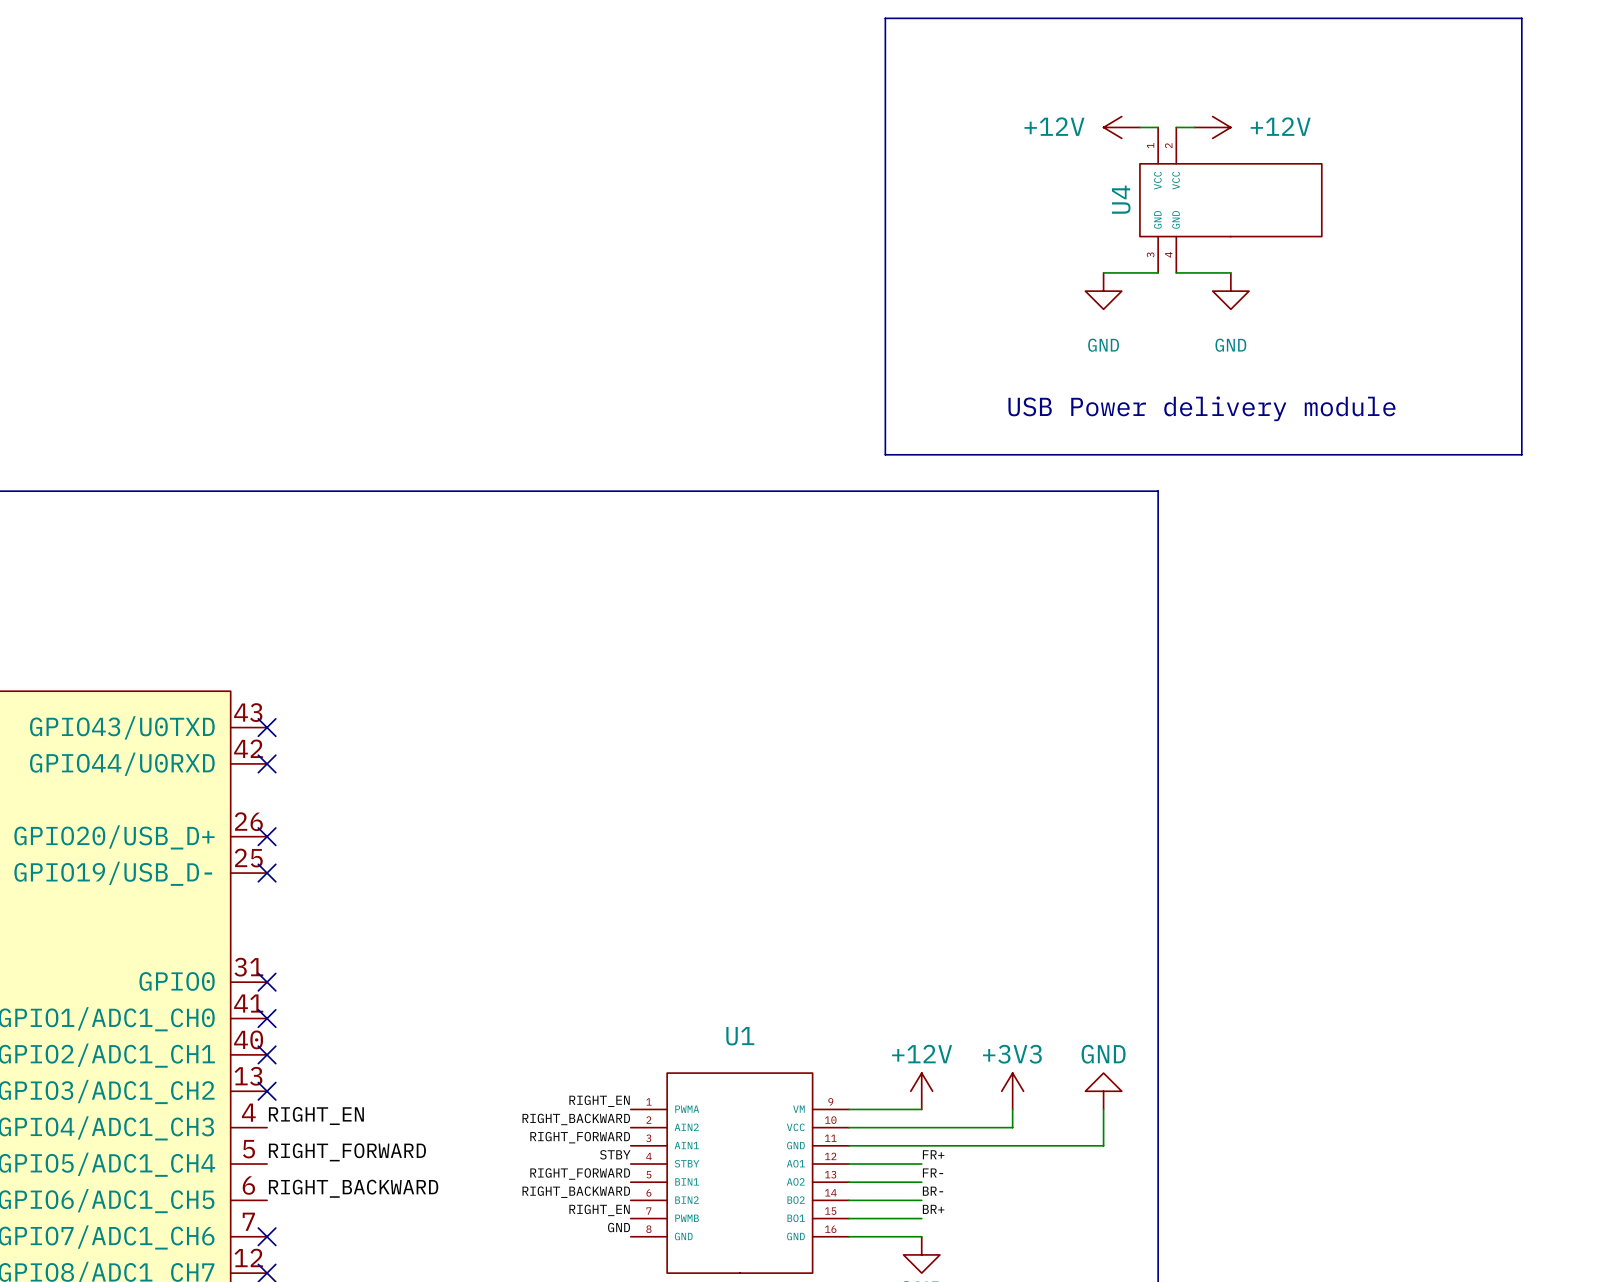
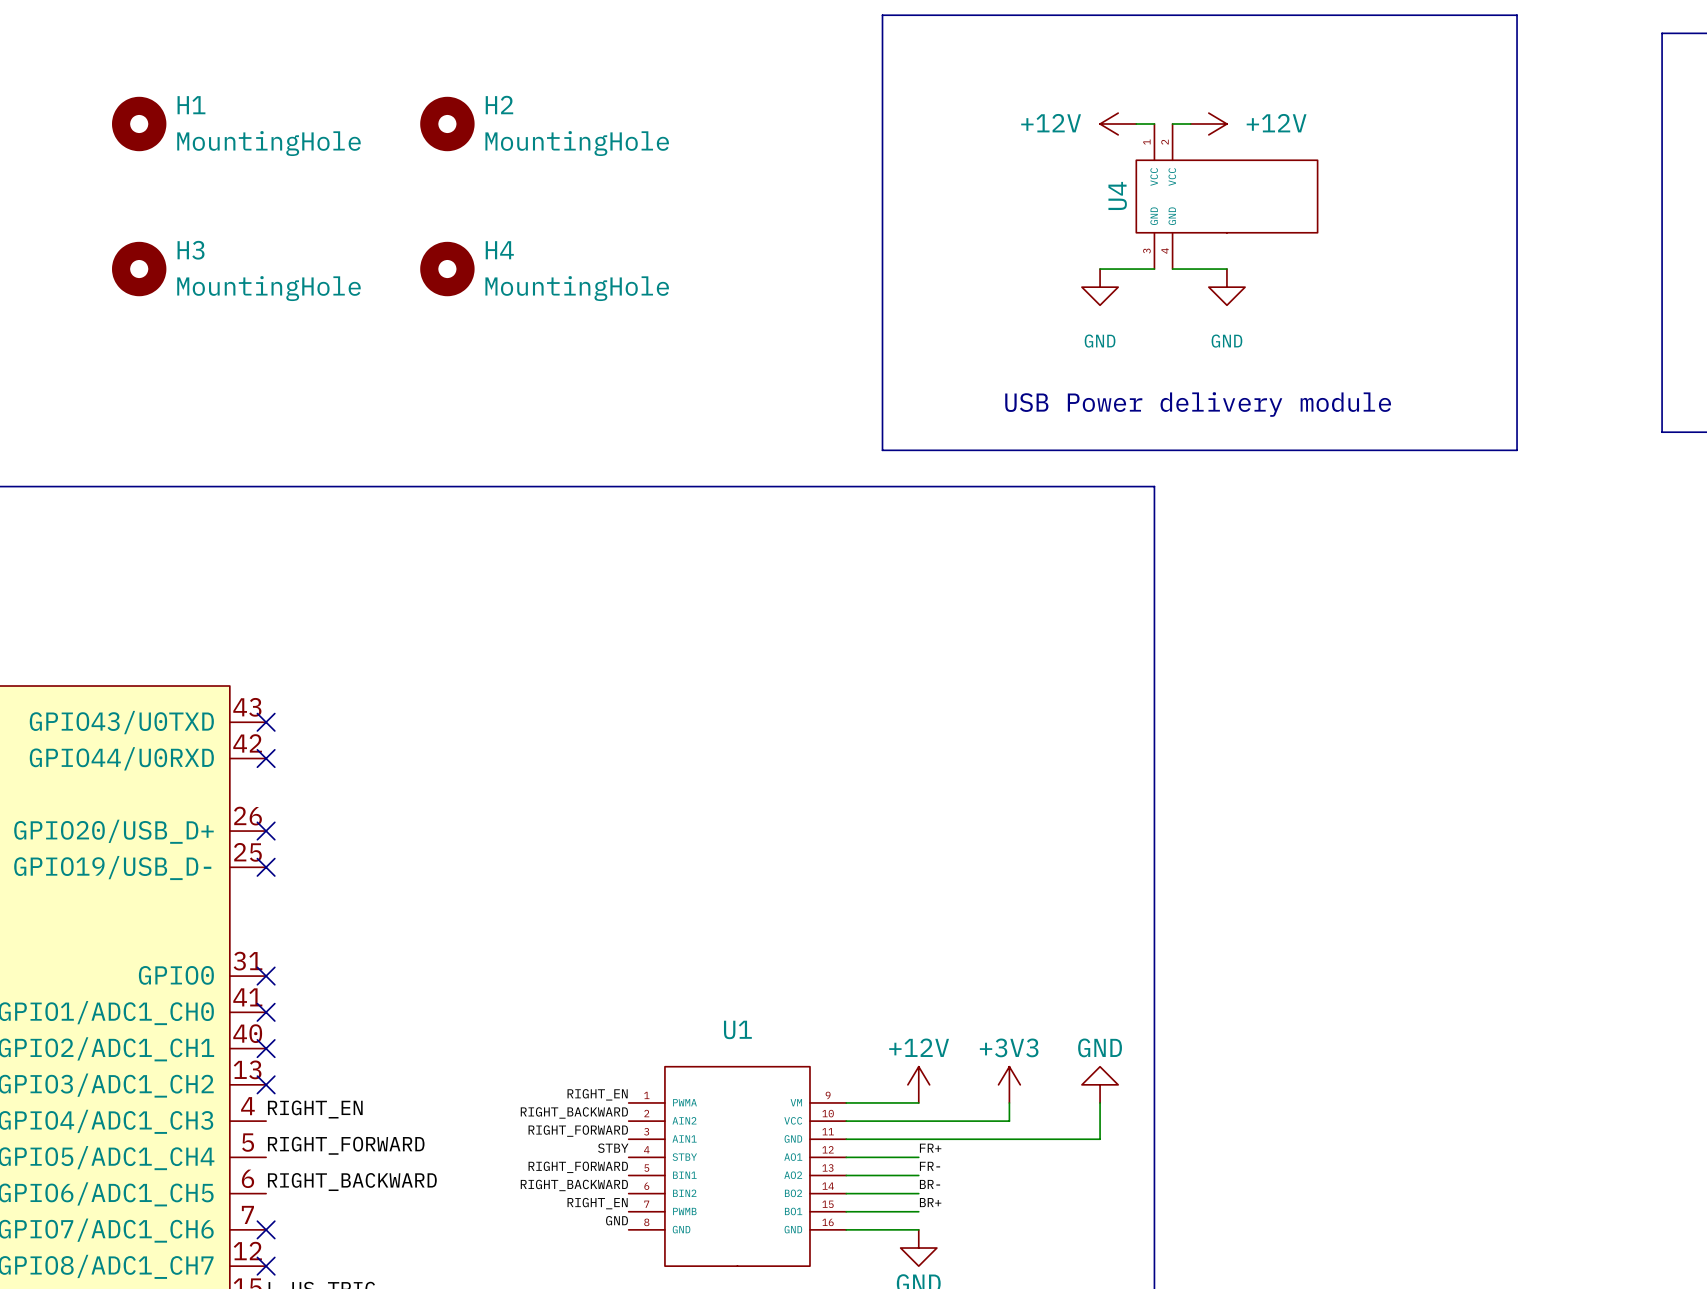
H1: none -> MountingHole (139, 123)
H2: none -> MountingHole (447, 123)
H3: none -> MountingHole (139, 269)
H4: none -> MountingHole (447, 269)

